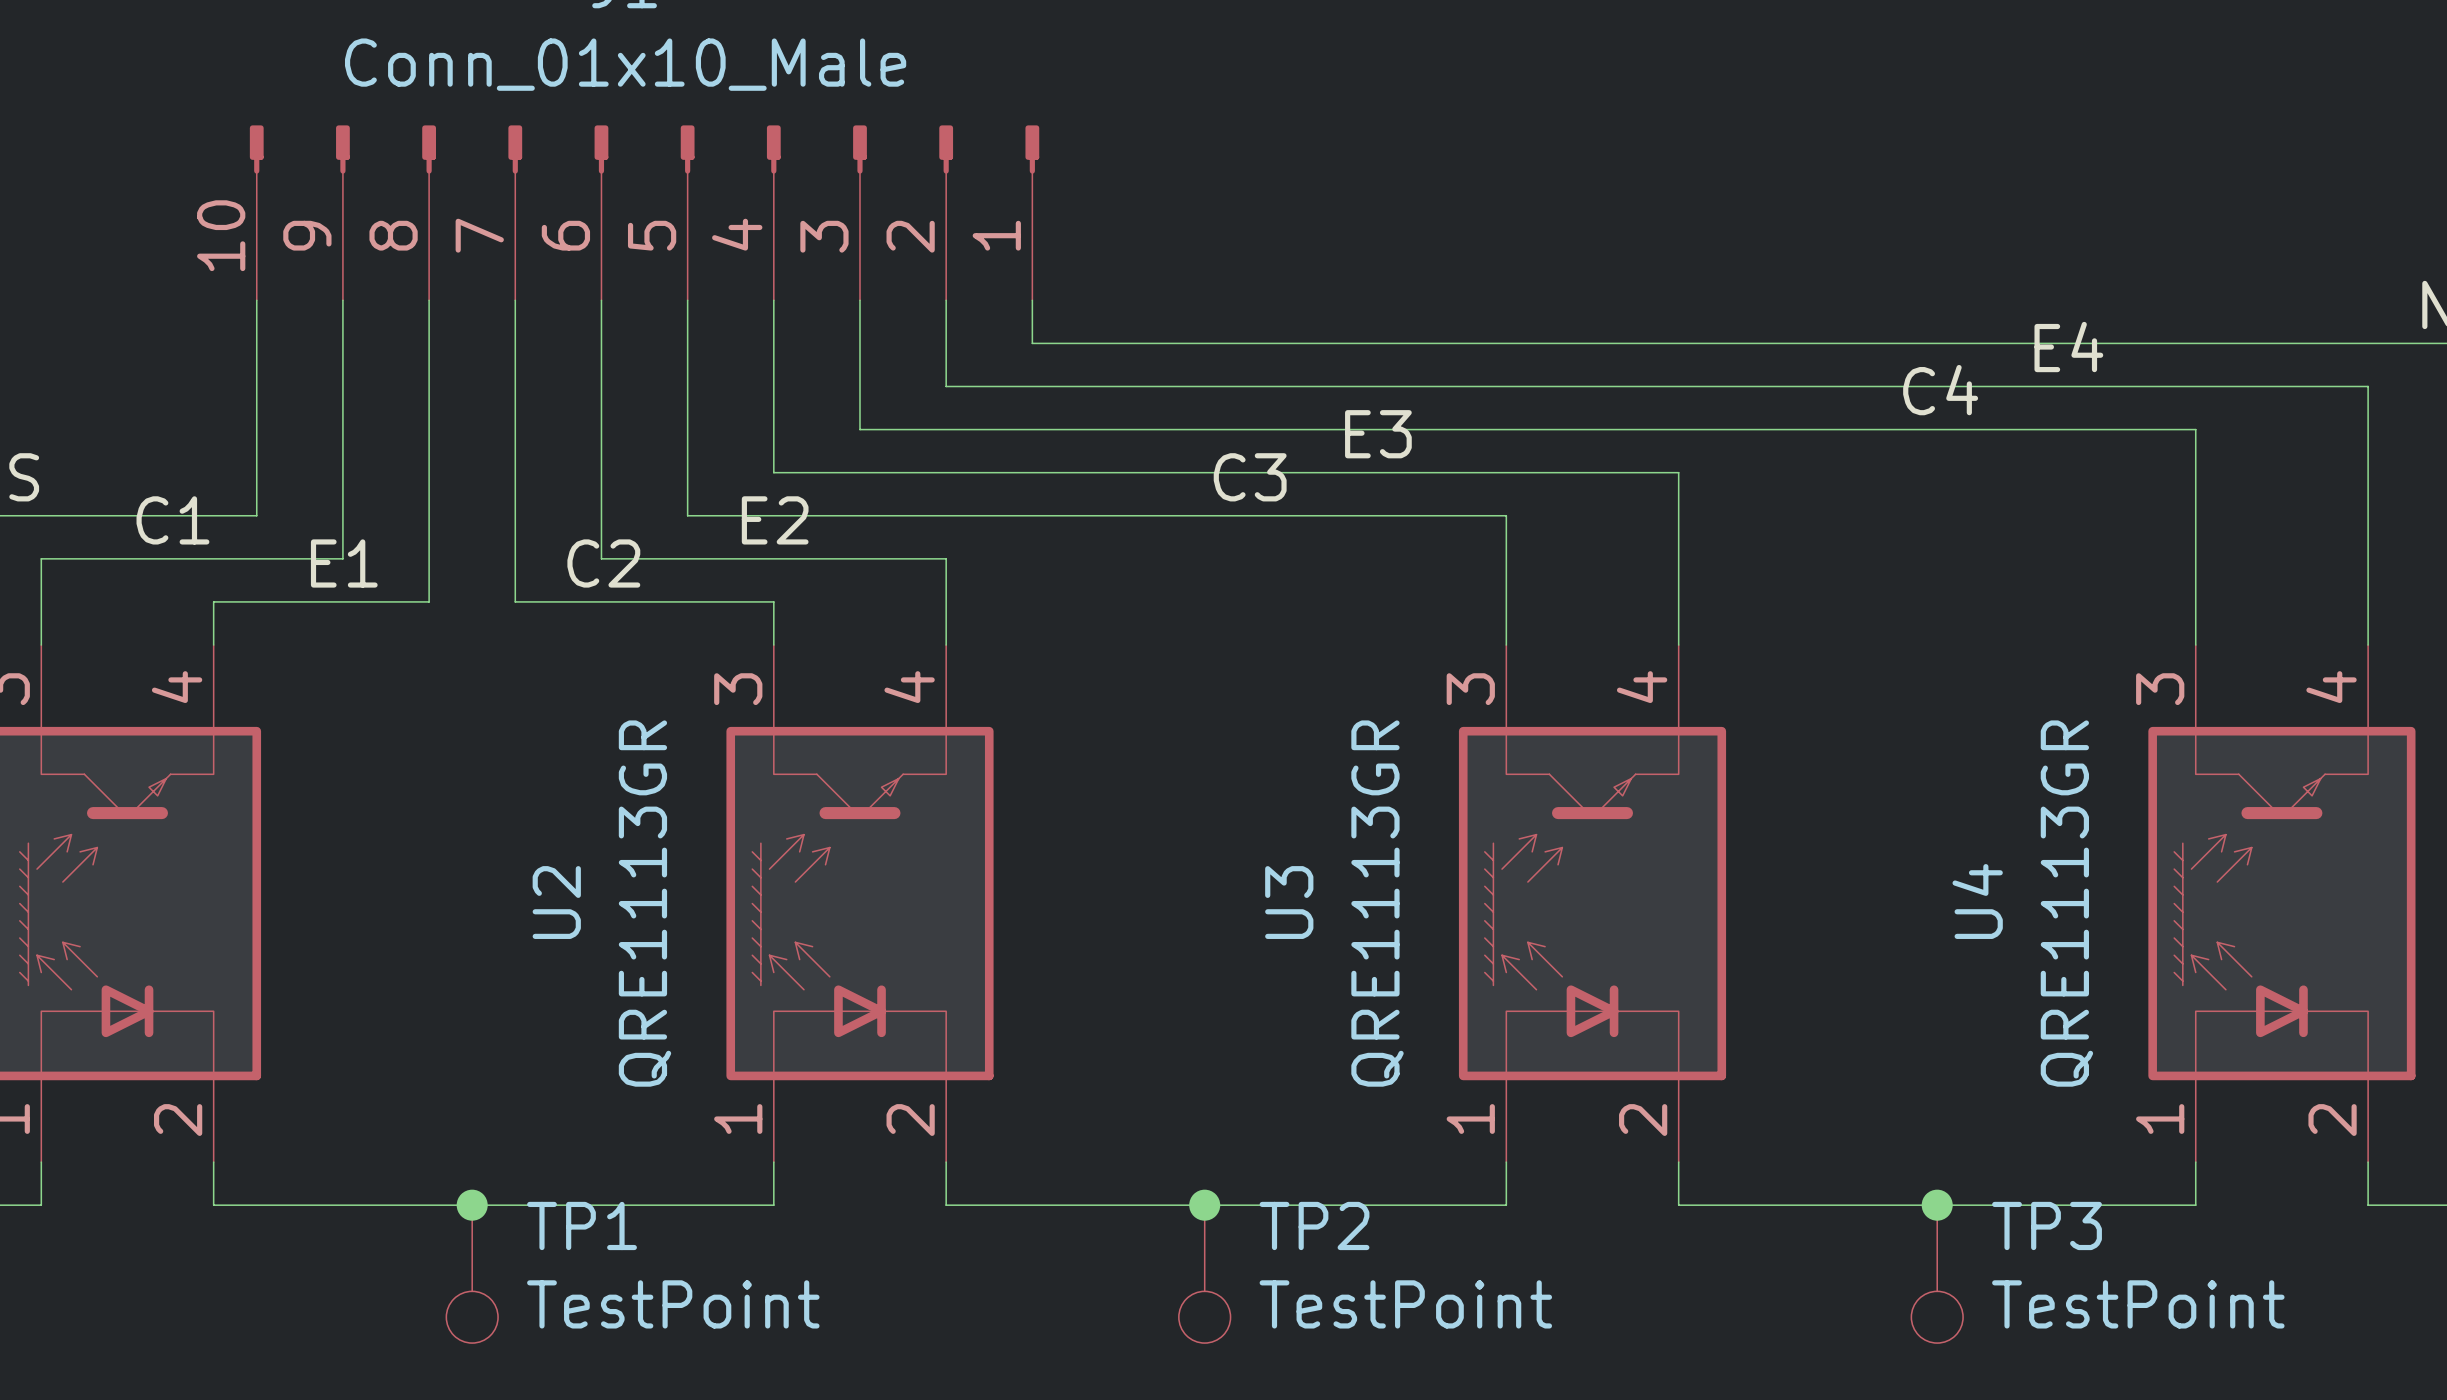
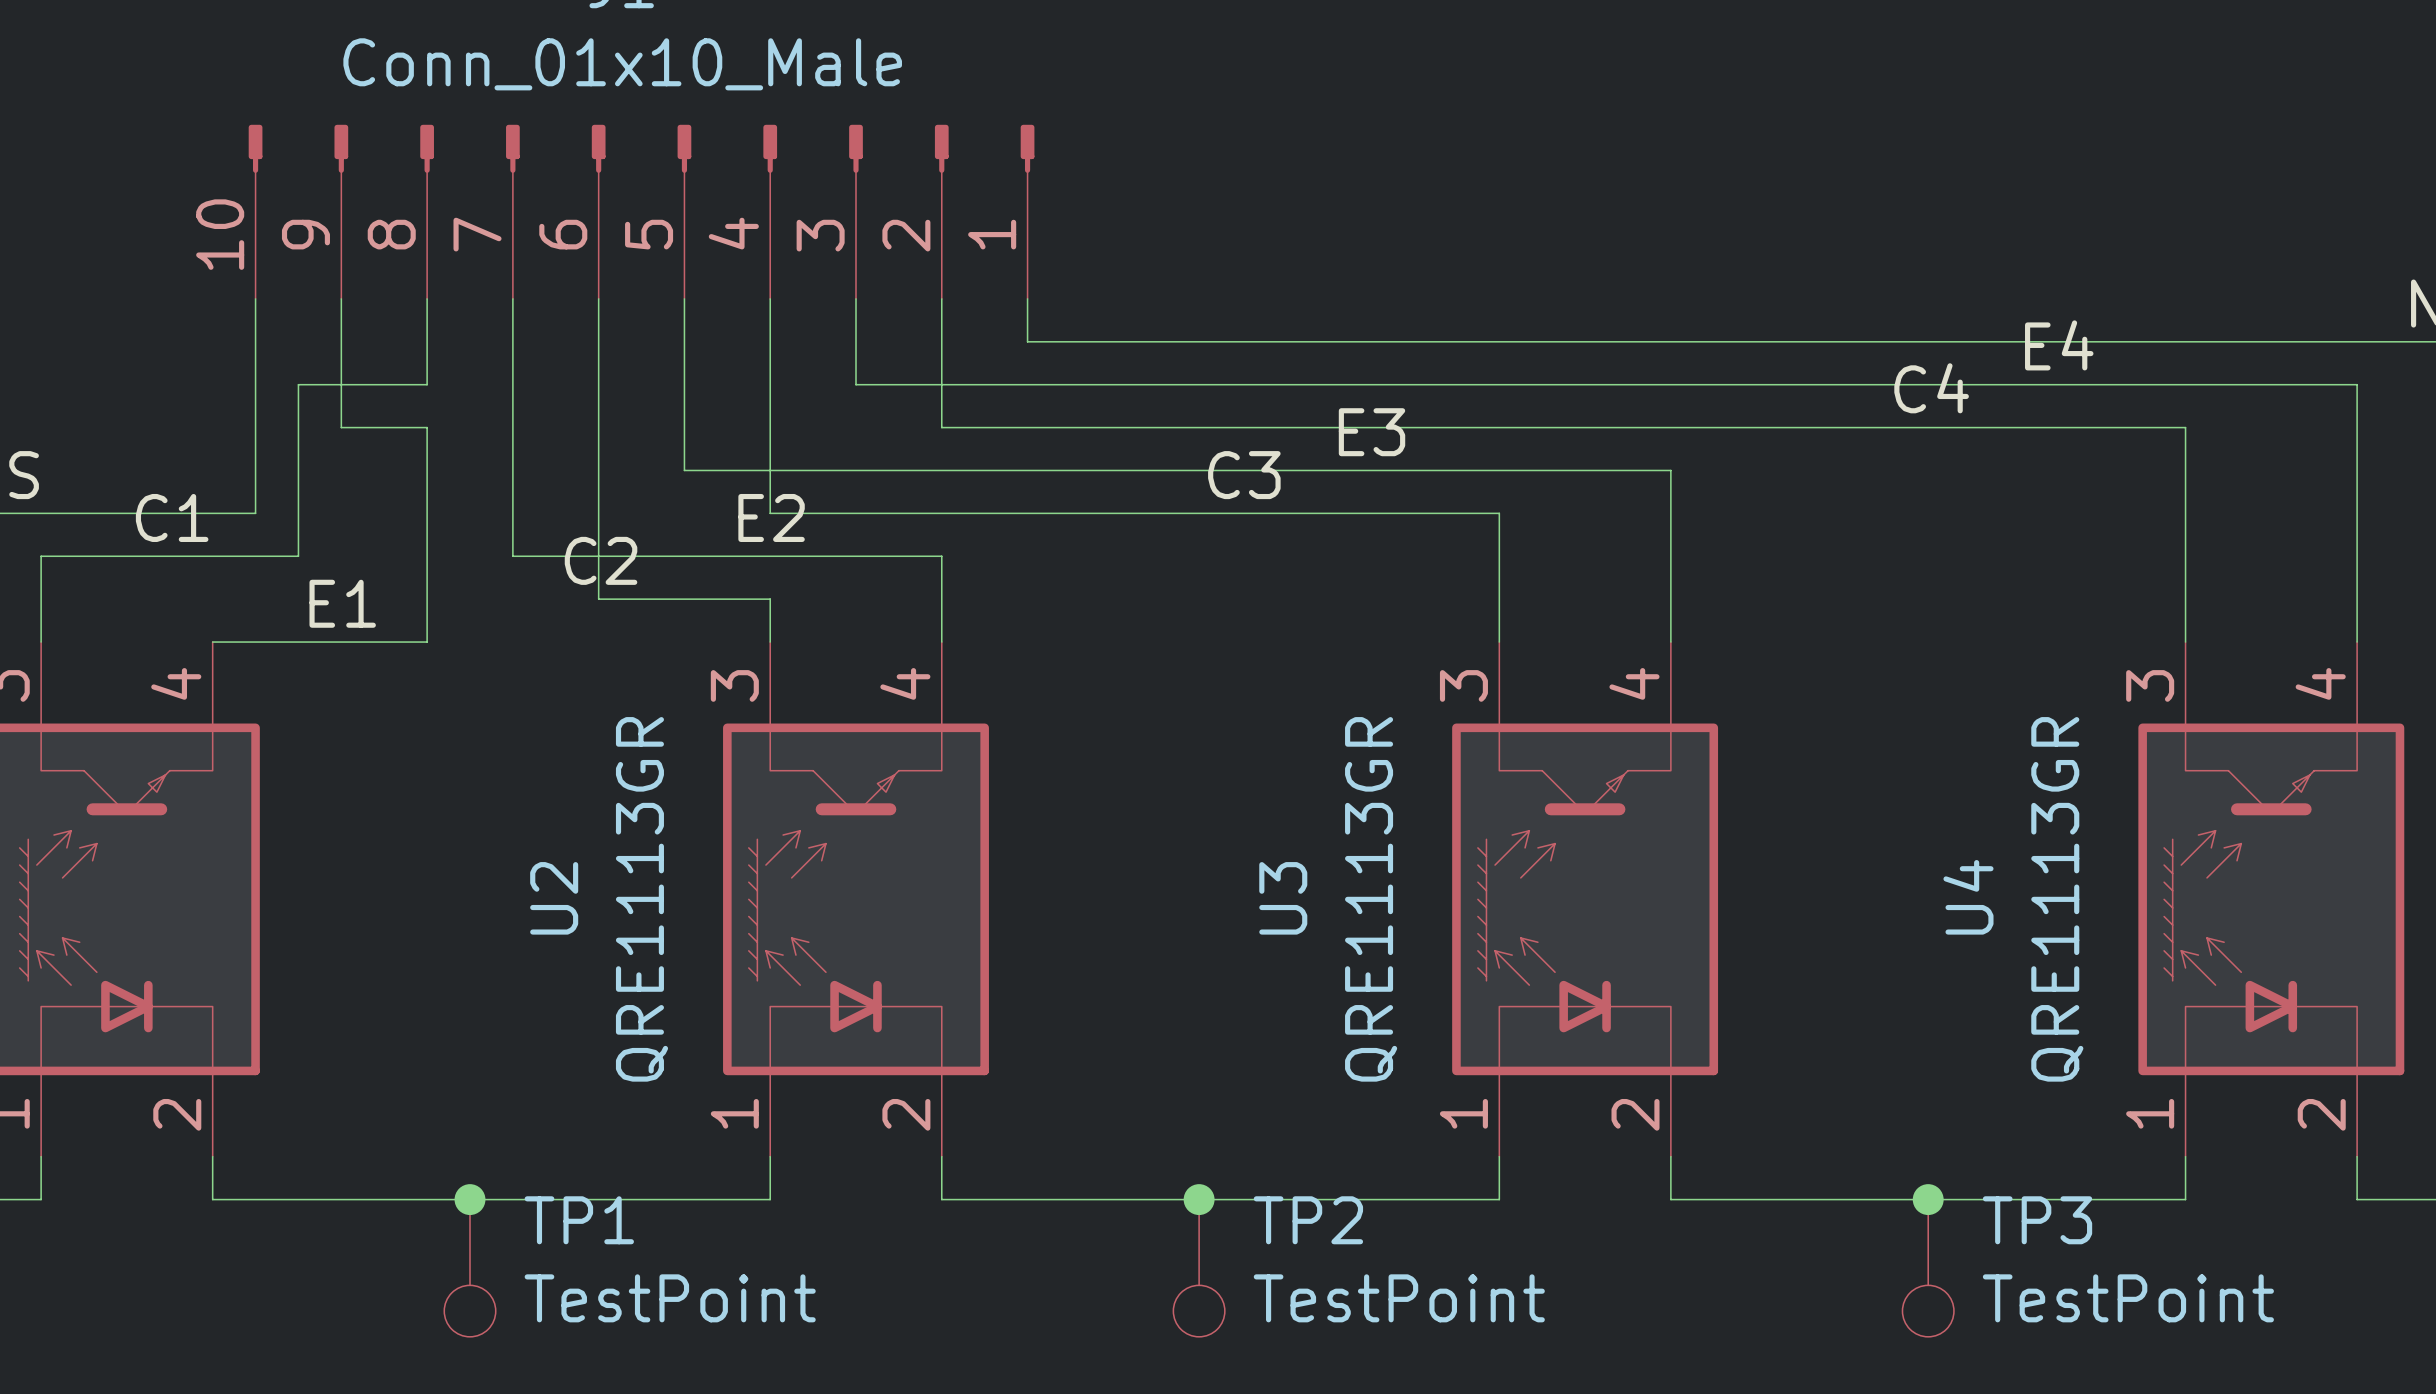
wire: (429, 386) (429, 429) -> (341, 427) (427, 427)
wire: (859, 386) (859, 429) (946, 429) -> (856, 384) (941, 384) (941, 427)
wire: (342, 429) (342, 558) (299, 558) -> (427, 384) (298, 384) (298, 556)
wire: (687, 472) (687, 515) (773, 515) -> (684, 470) (770, 470) (770, 513)
wire: (515, 558) (515, 601) (601, 601) -> (512, 556) (598, 556) (598, 599)
label position: E1 (344, 563) -> E1 (342, 603)
wire: (429, 601) (213, 601) (213, 645) -> (427, 599) (427, 642) (212, 642)

